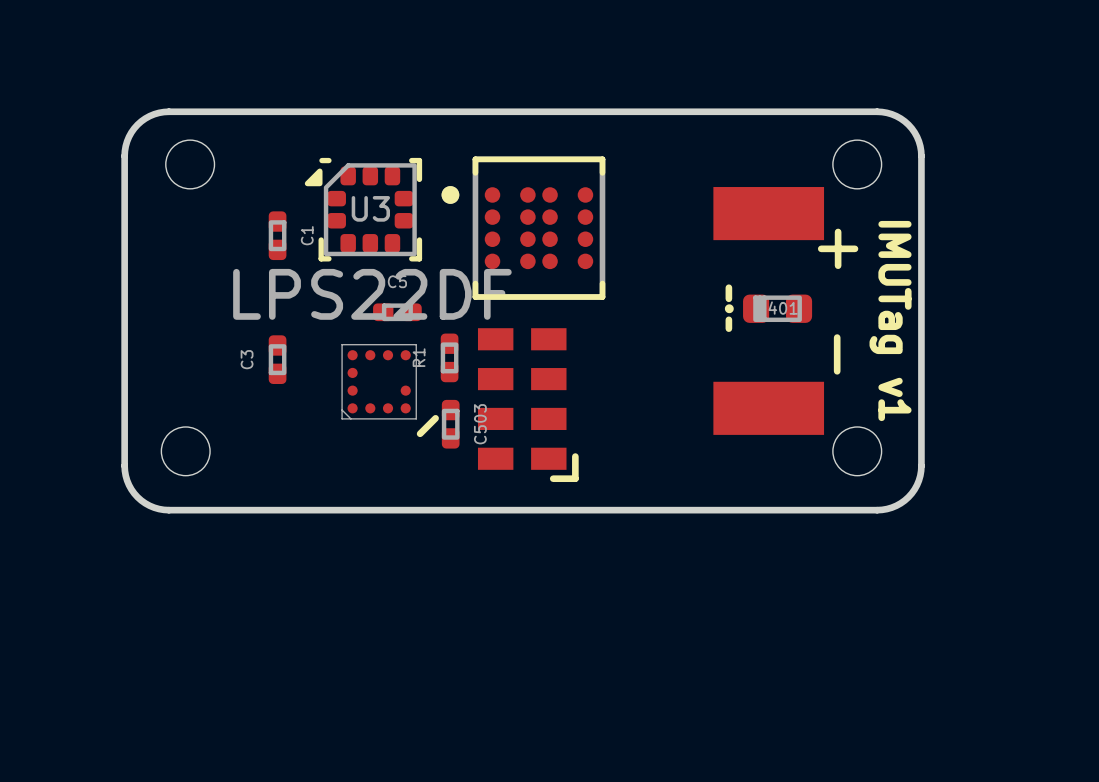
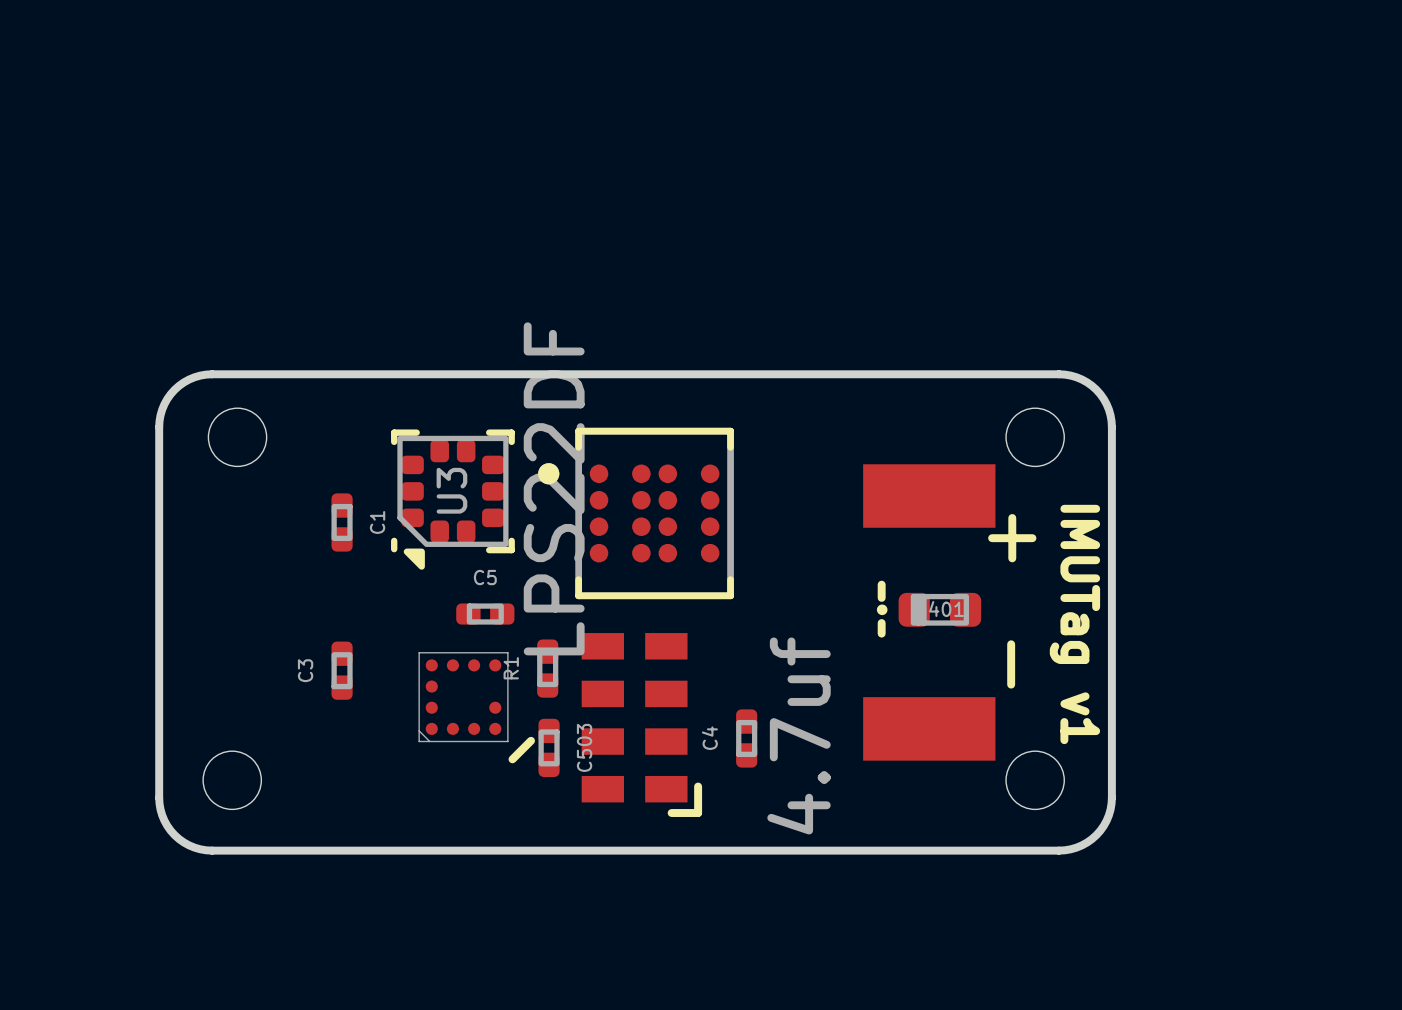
U3 rotation: 0° (363, 209) -> 90° counterclockwise (452, 499)
C4: none -> 4.7uf (746, 738)

